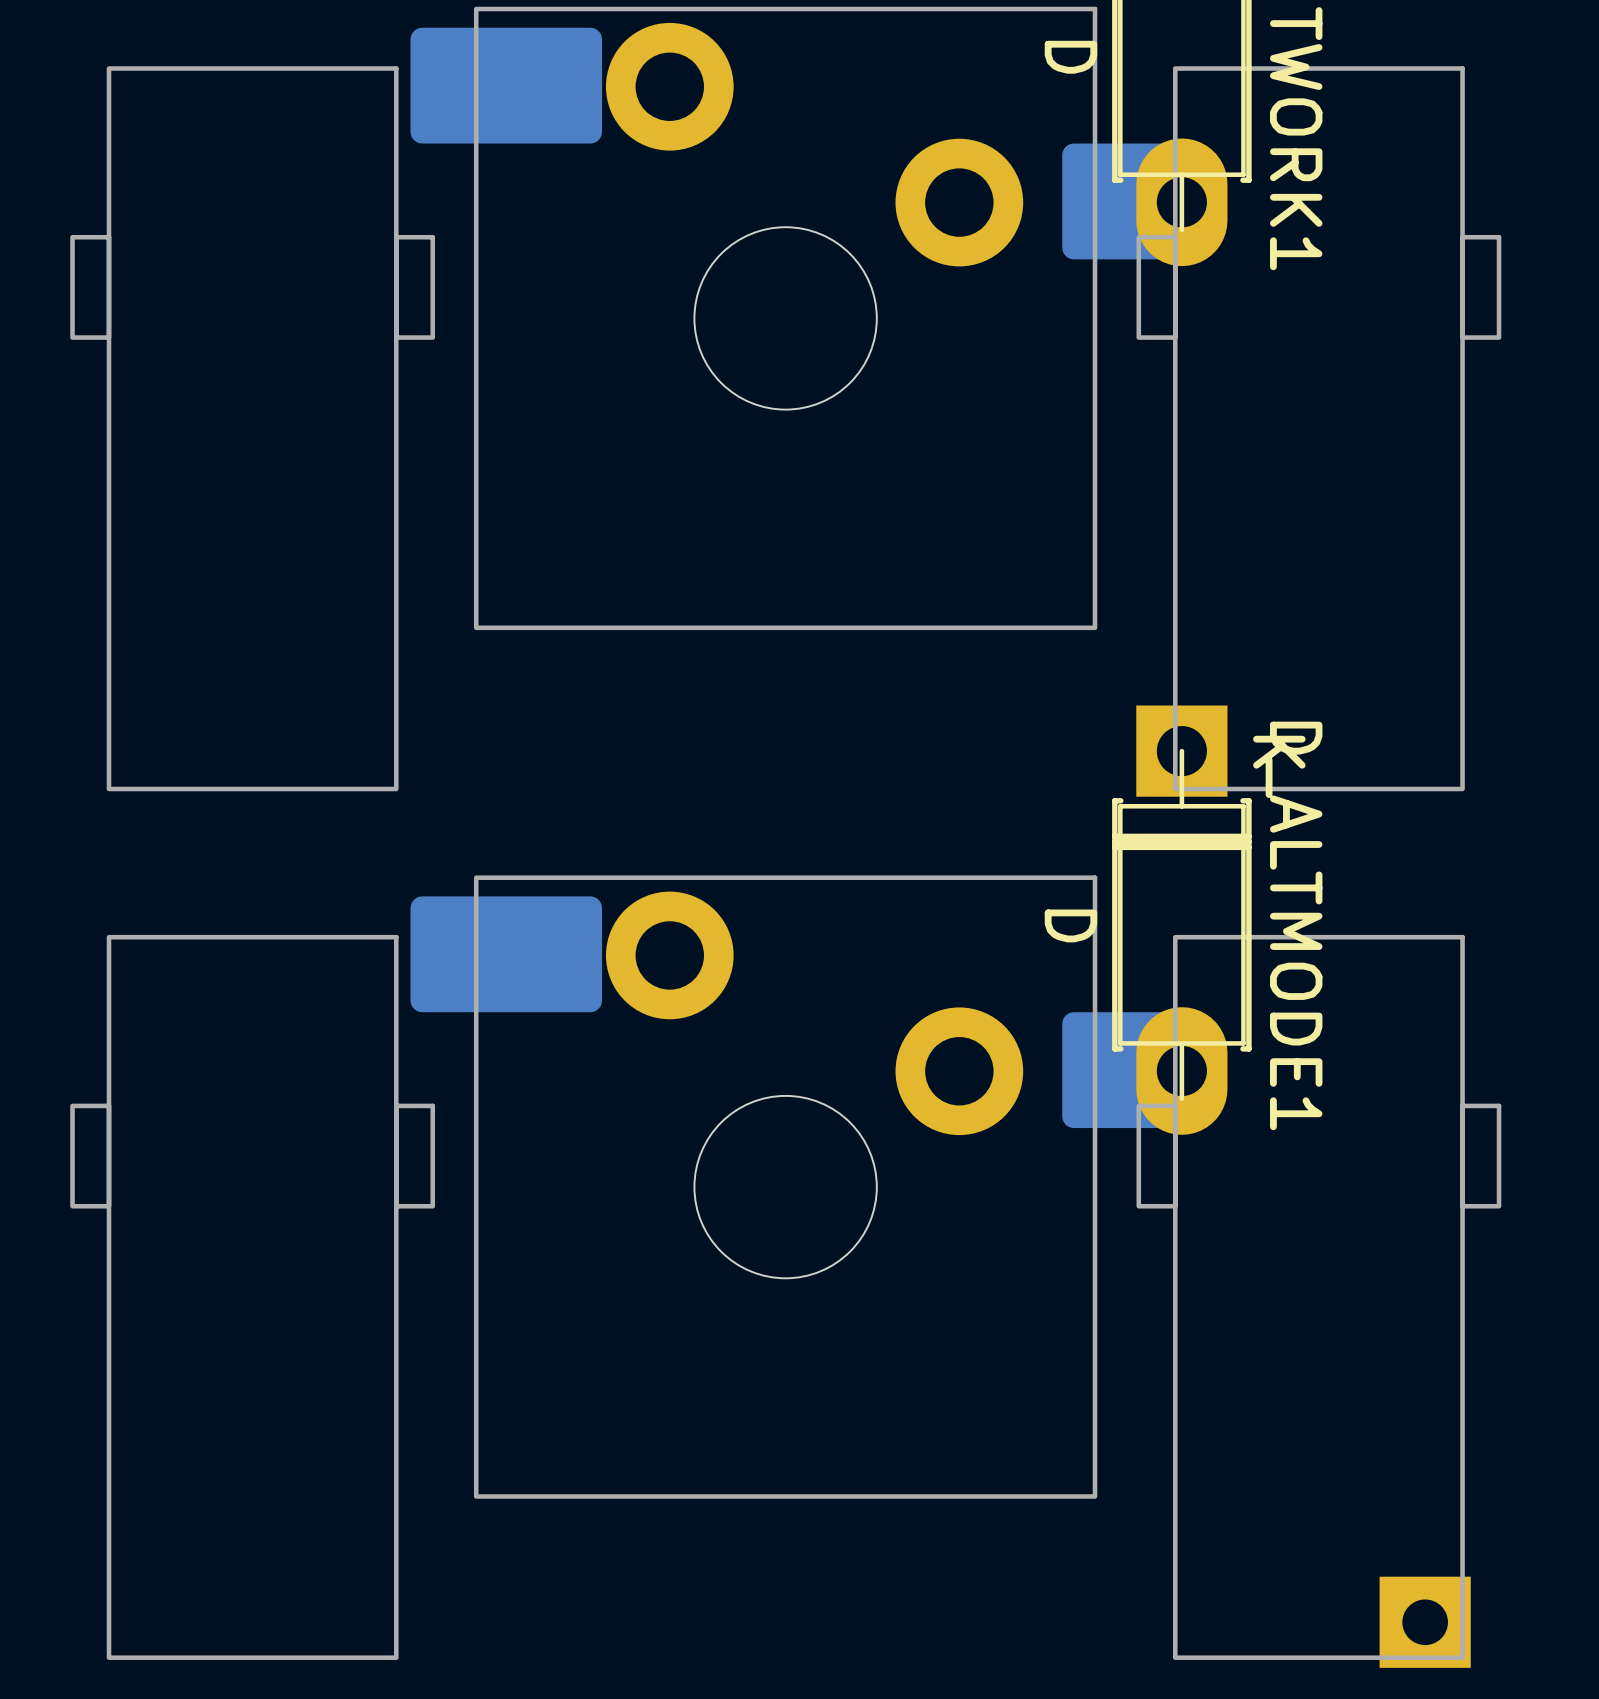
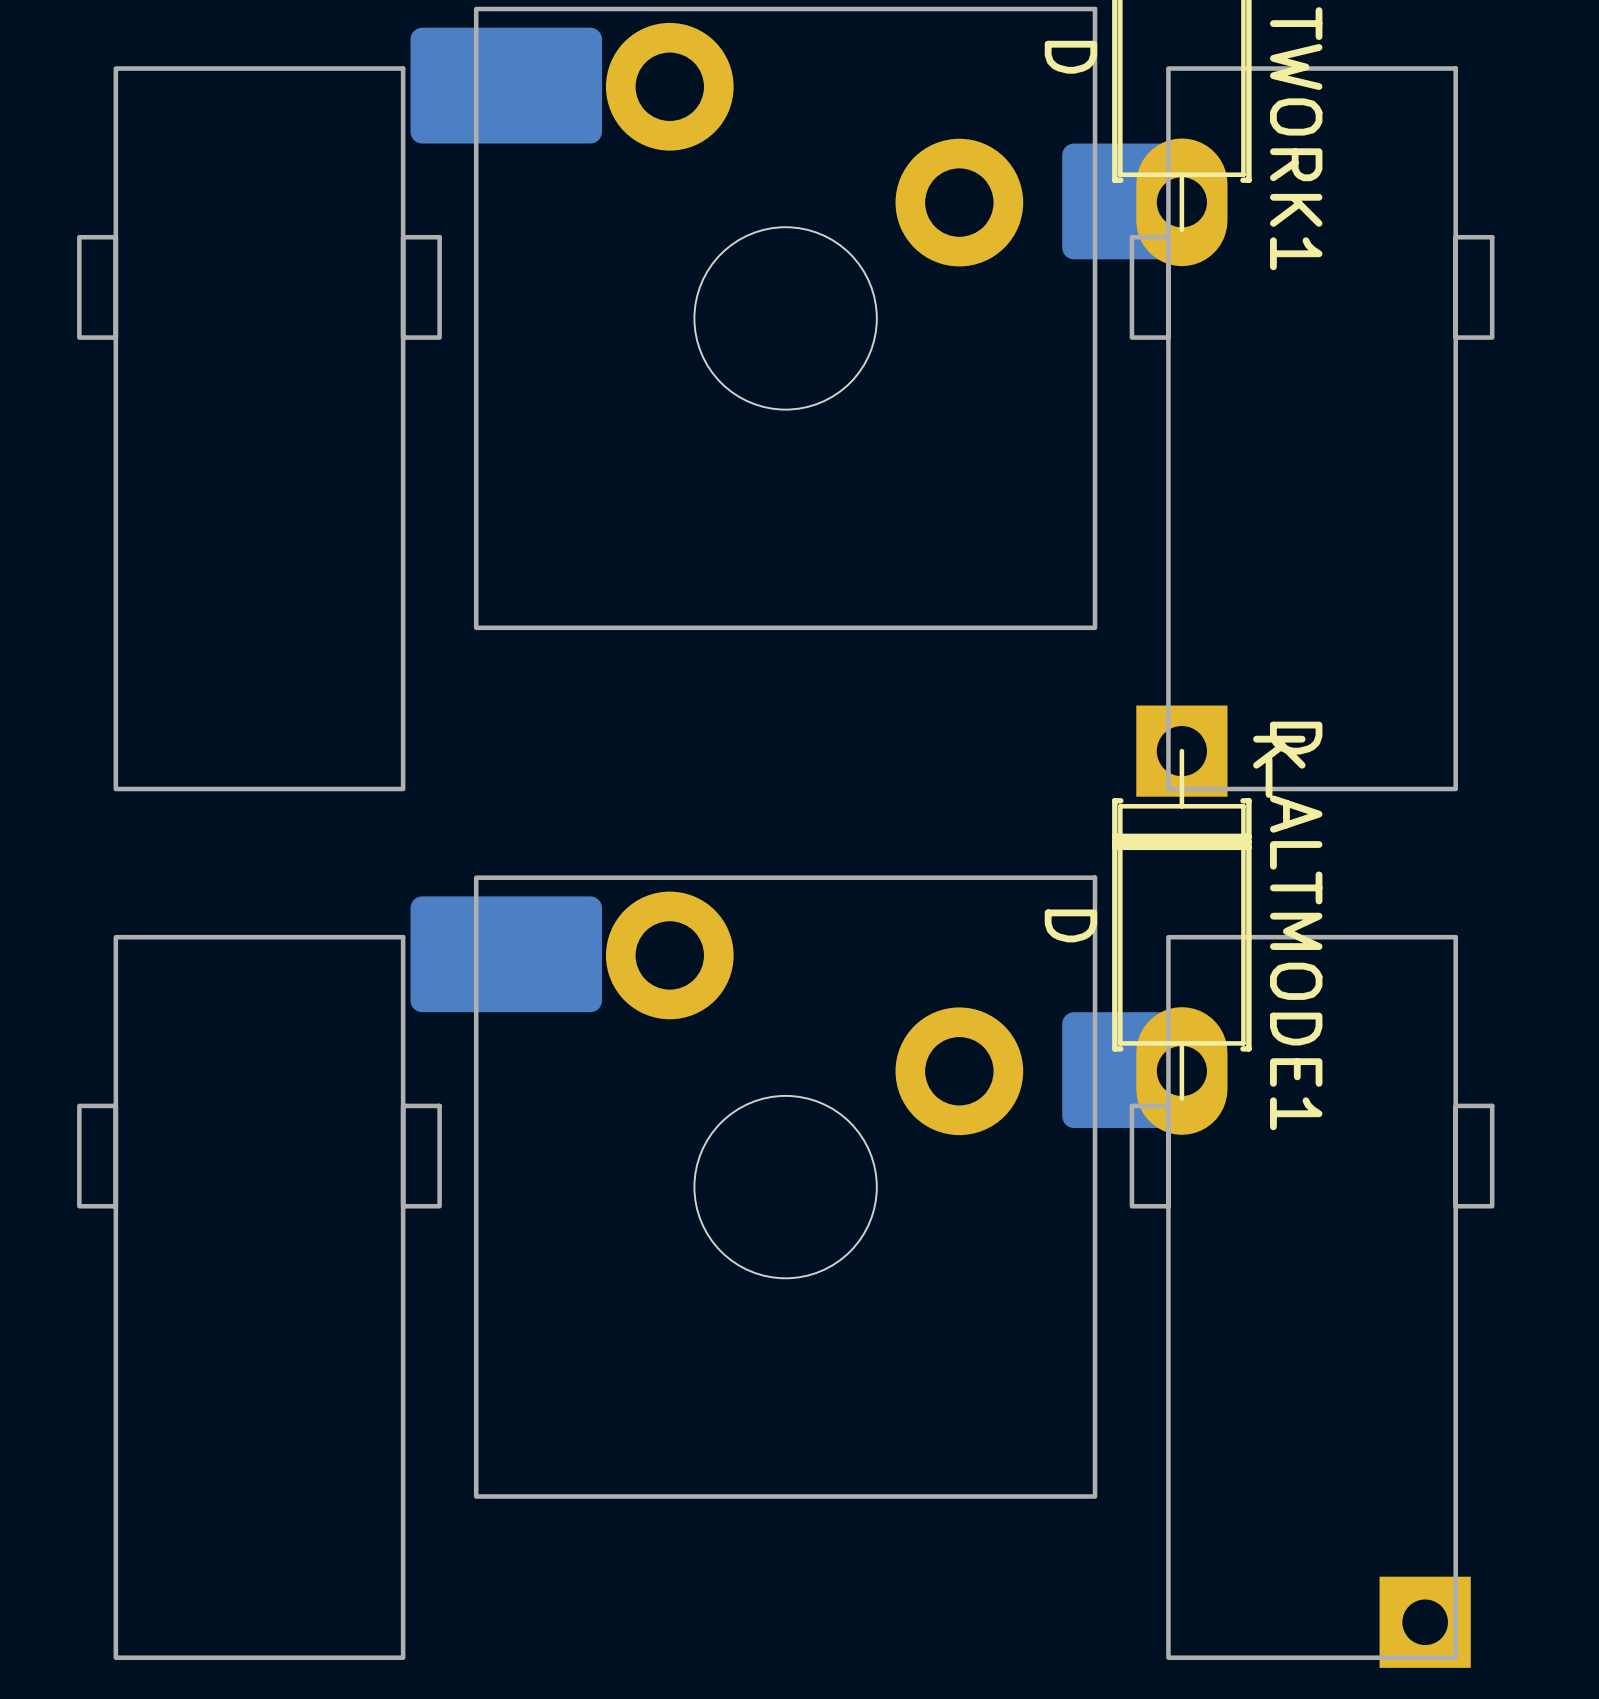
part footprint: [70, 6, 1502, 792] -> [77, 6, 1495, 792]
part footprint: [70, 875, 1502, 1660] -> [77, 875, 1495, 1660]

